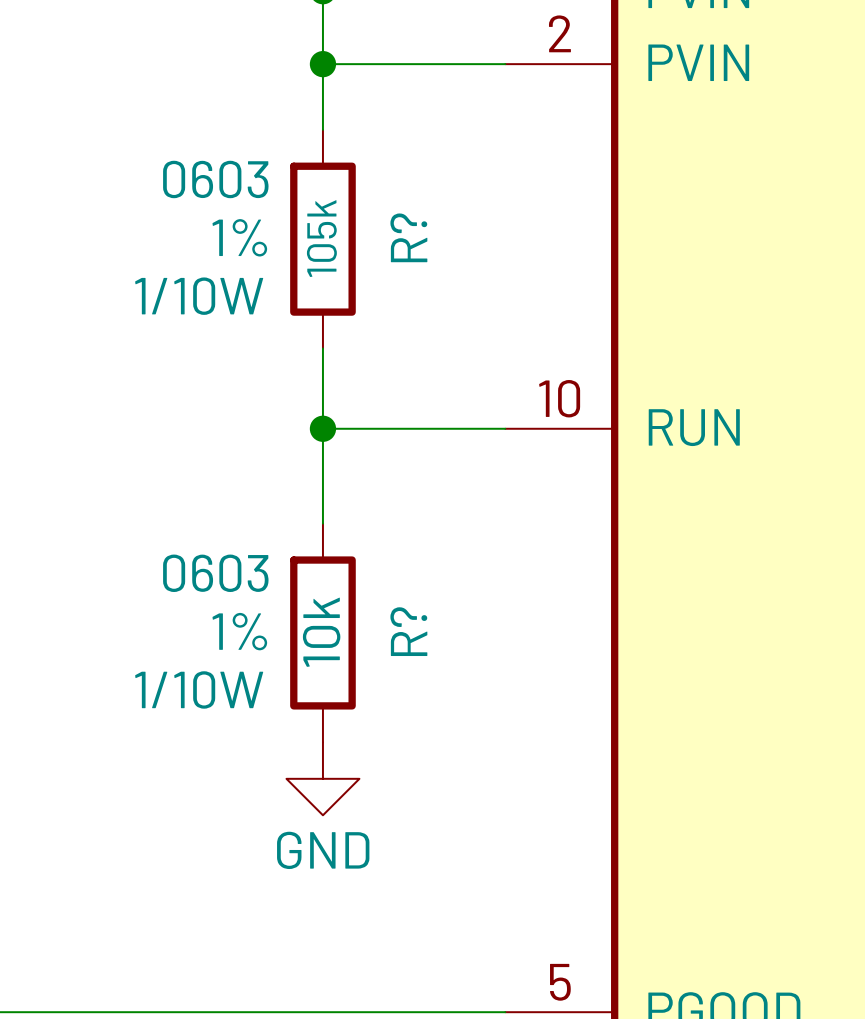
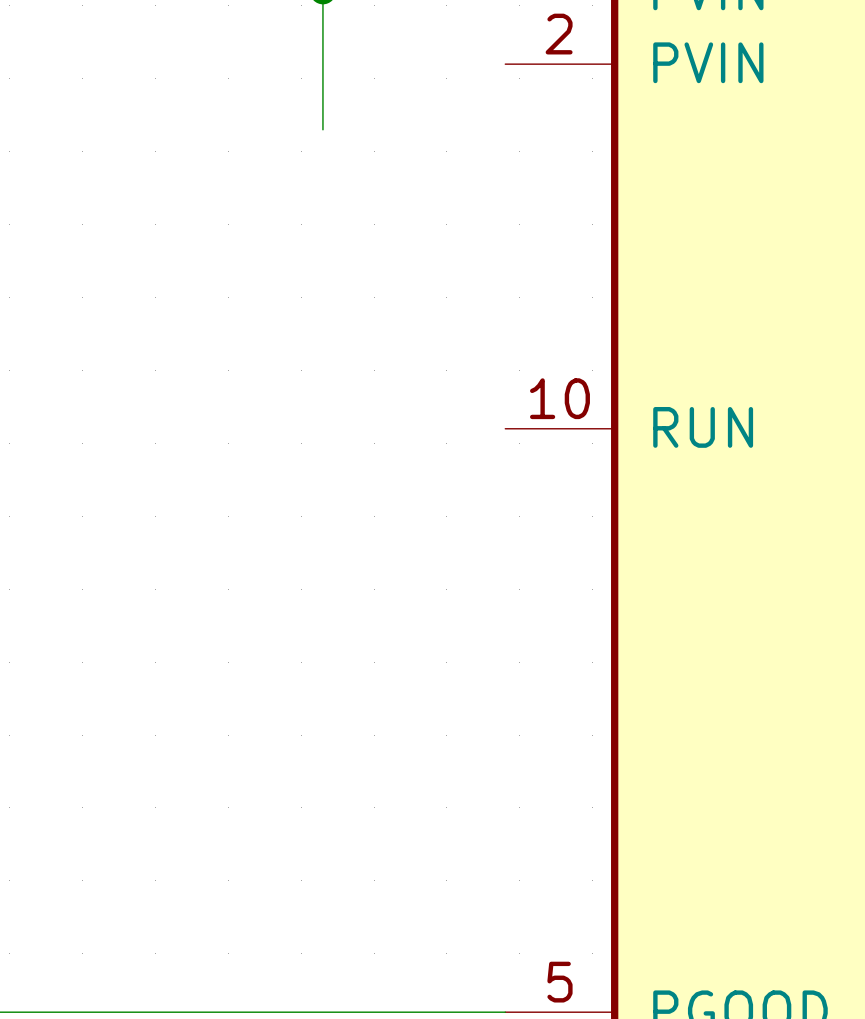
wire: (322, 64) (505, 64) -> none
junction: (322, 64) -> none
R?: 105k (322, 239) -> none
wire: (322, 348) (322, 523) -> none
wire: (322, 428) (505, 428) -> none
junction: (322, 428) -> none
R?: 10k (322, 632) -> none
power symbol: GND (322, 778) -> none

